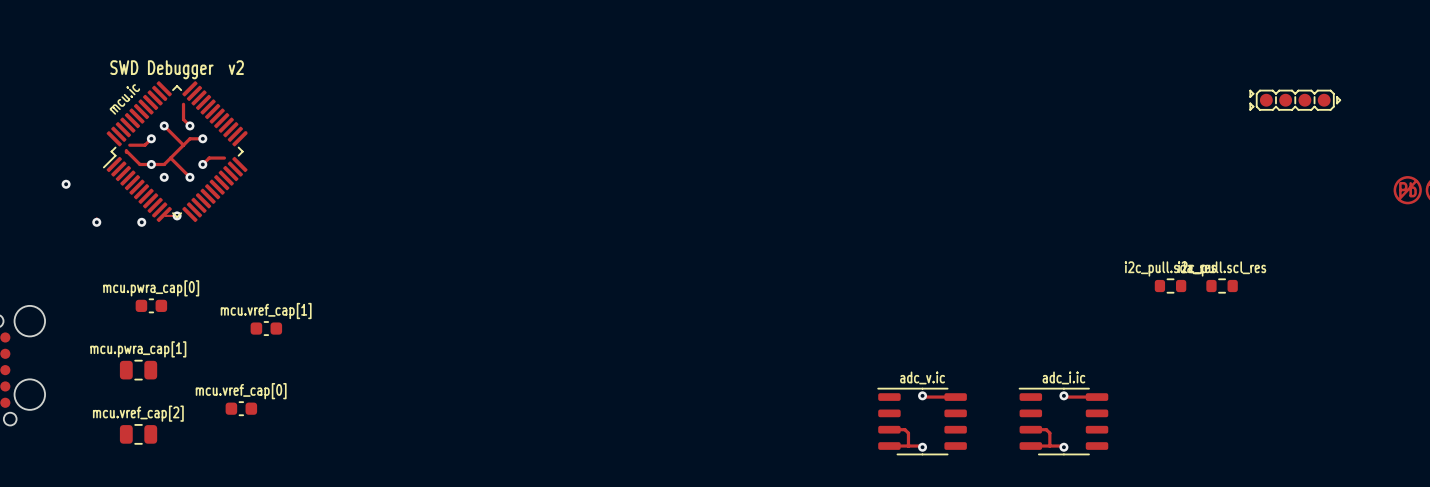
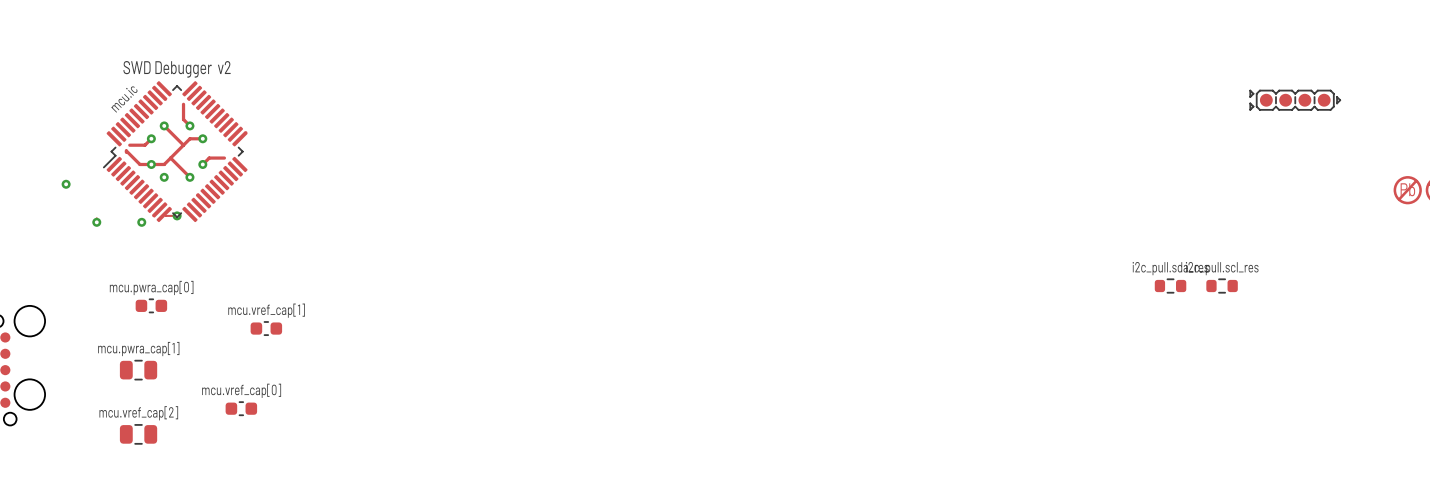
track: (922, 395) (955, 397) -> none
via: (922, 395) -> none
track: (1063, 395) (1097, 397) -> none
via: (1063, 395) -> none
adc_v.ic: (922, 421) -> none
adc_i.ic: (1063, 421) -> none
track: (889, 429) (905, 429) (908, 433) (908, 446) -> none
track: (1030, 429) (1046, 429) (1049, 433) (1049, 446) -> none
track: (889, 446) (922, 447) -> none
track: (1030, 446) (1063, 447) -> none
via: (922, 447) -> none
via: (1063, 447) -> none

